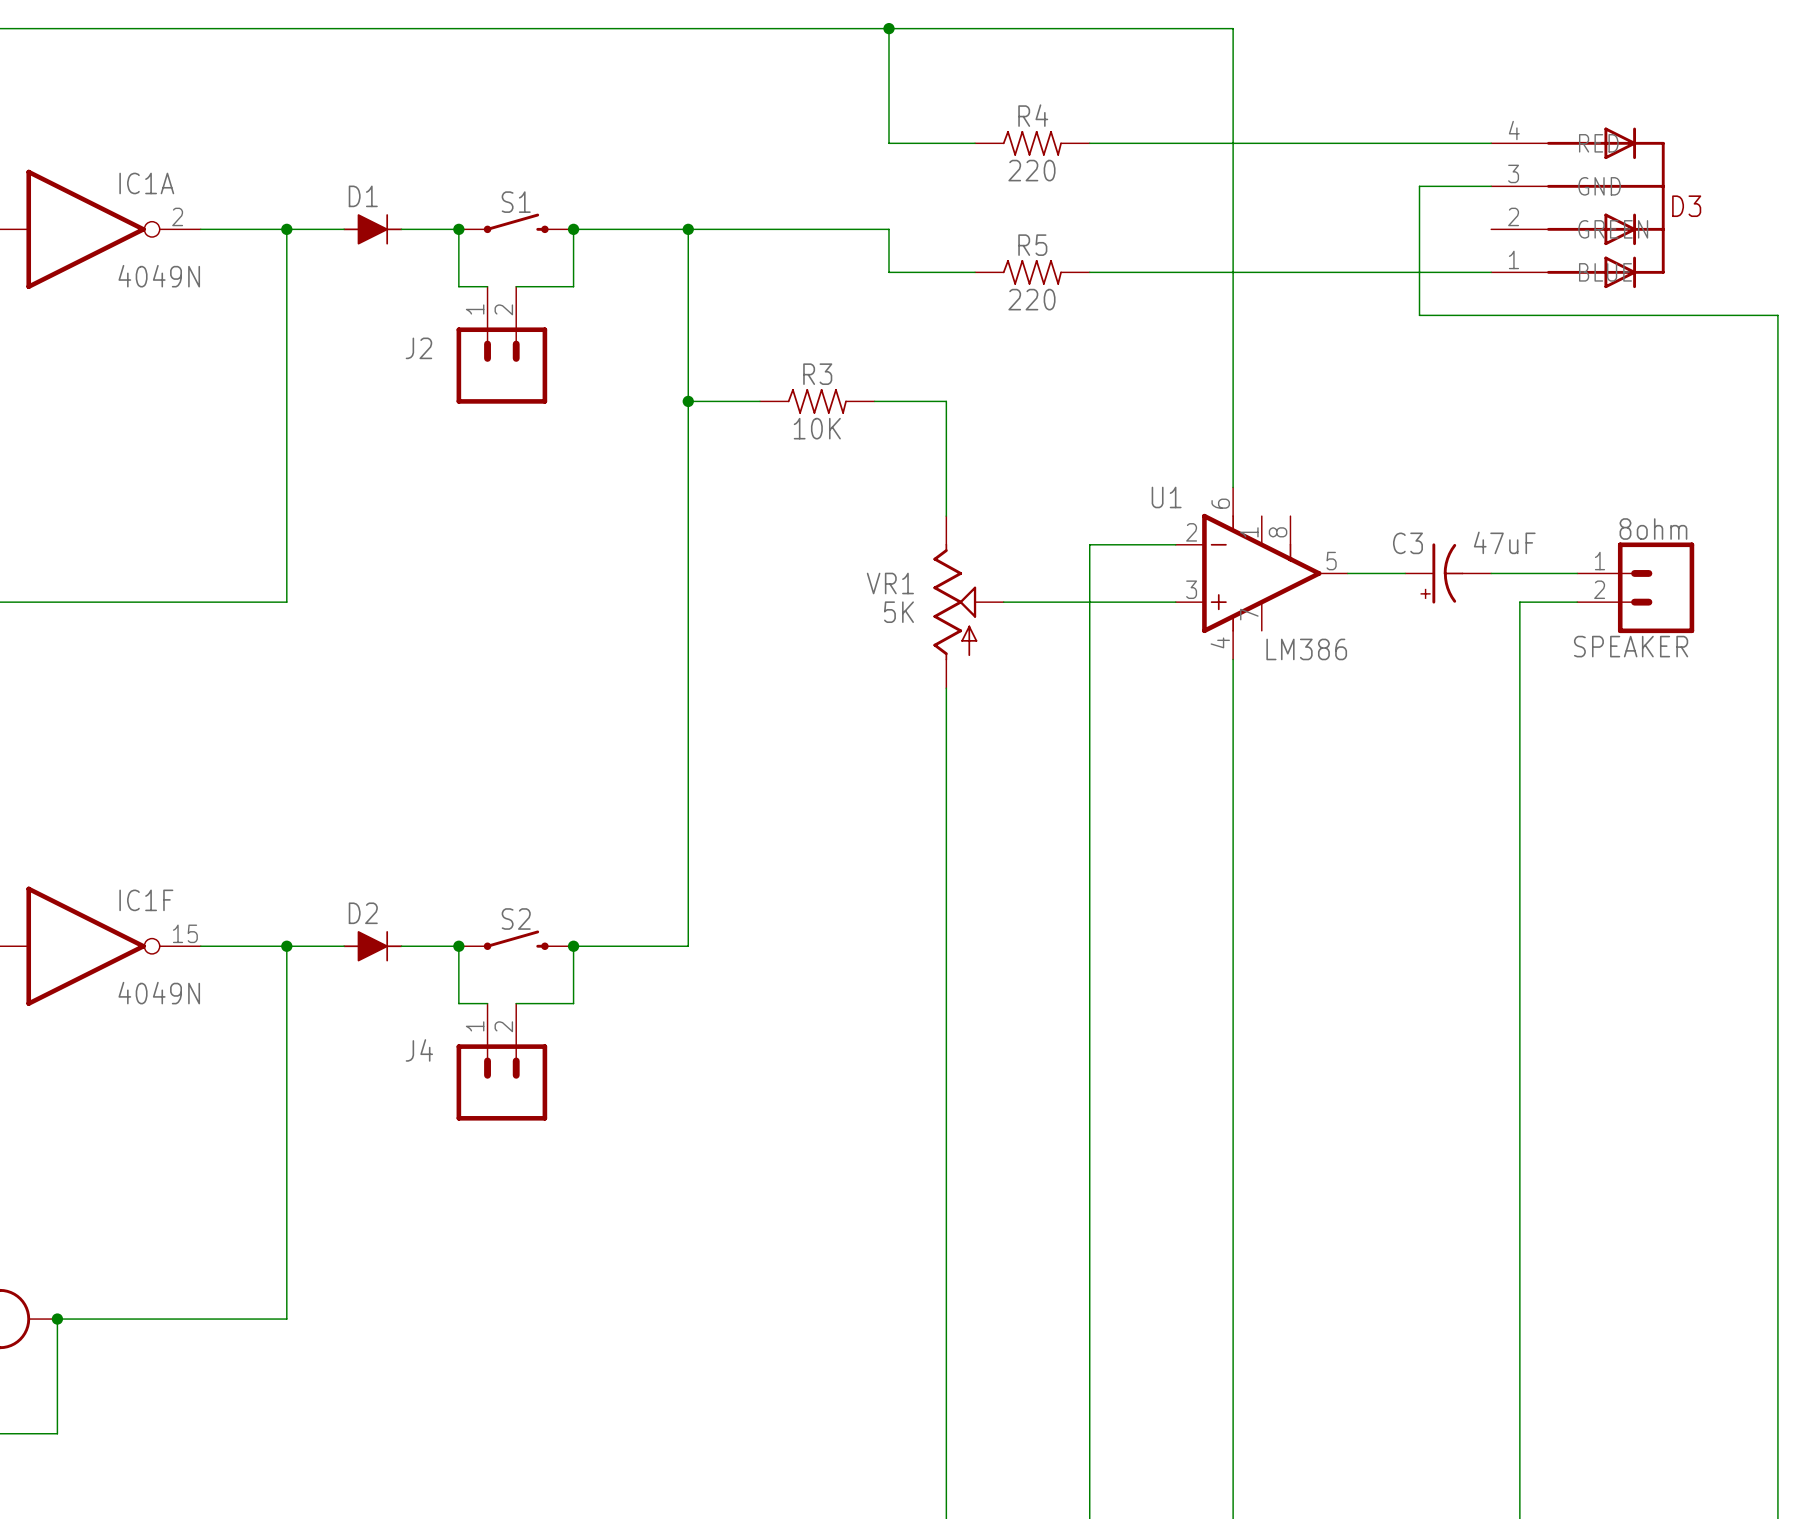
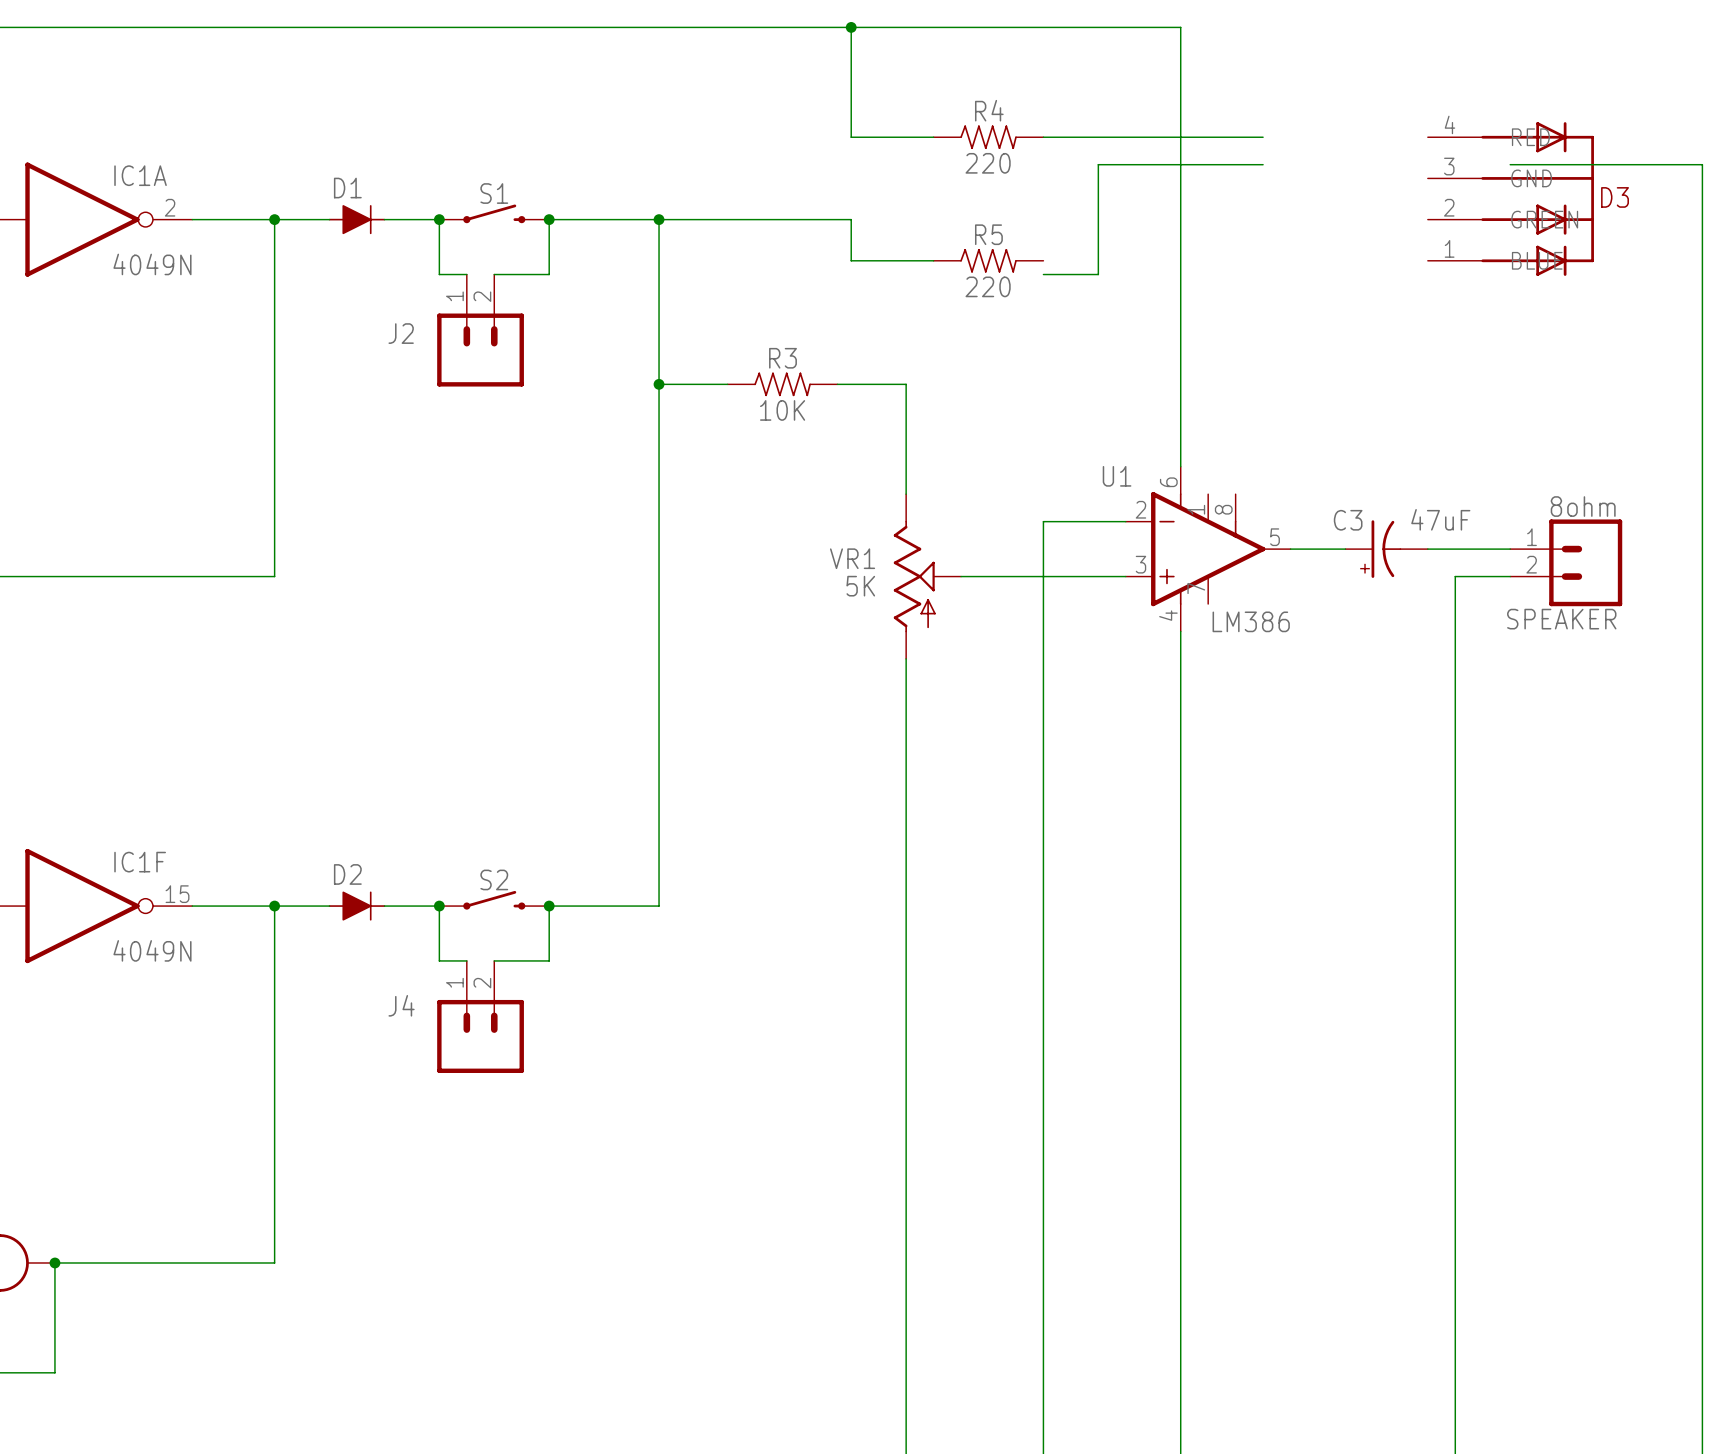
wire: (1319, 143) (1491, 143) -> none
wire: none -> (1263, 164) (1098, 164) (1098, 274) (1043, 274)
wire: (1491, 186) (1419, 186) (1419, 315) (1777, 315) -> (1510, 164) (1702, 164) (1702, 301)
wire: (1089, 272) (1491, 272) -> none

